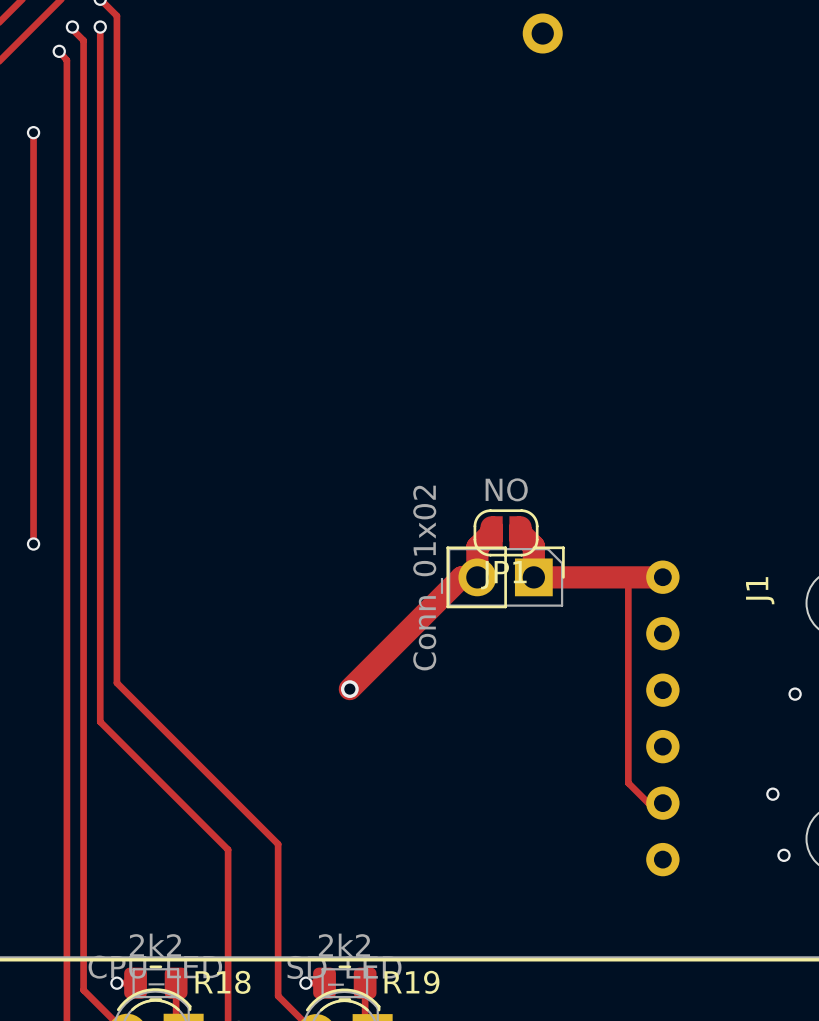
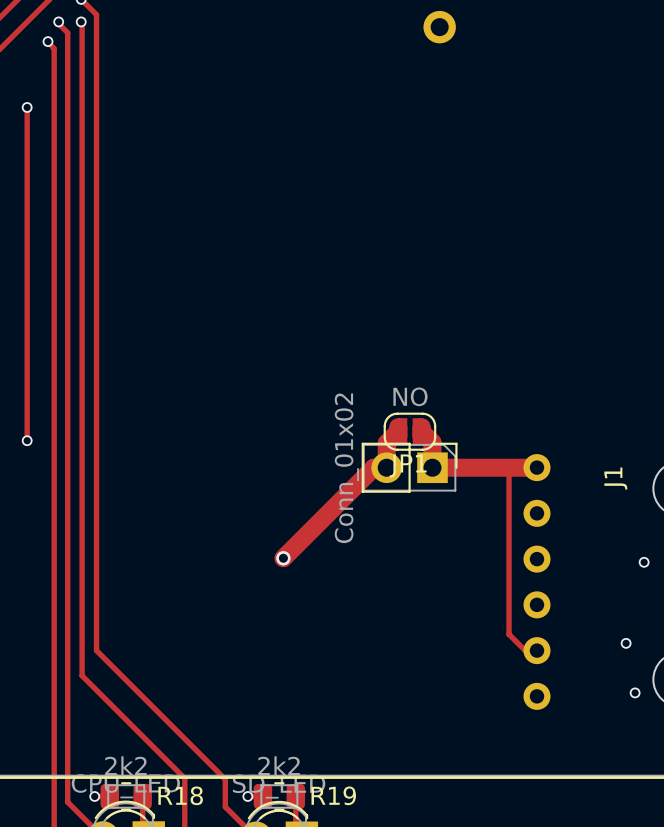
track: (116, 15) (116, 682) (278, 844) (278, 962) -> (94, 12) (96, 14) (96, 650) (225, 779)
track: (100, 27) (100, 721) (228, 849) (228, 960) -> (81, 21) (82, 675) (184, 778)

